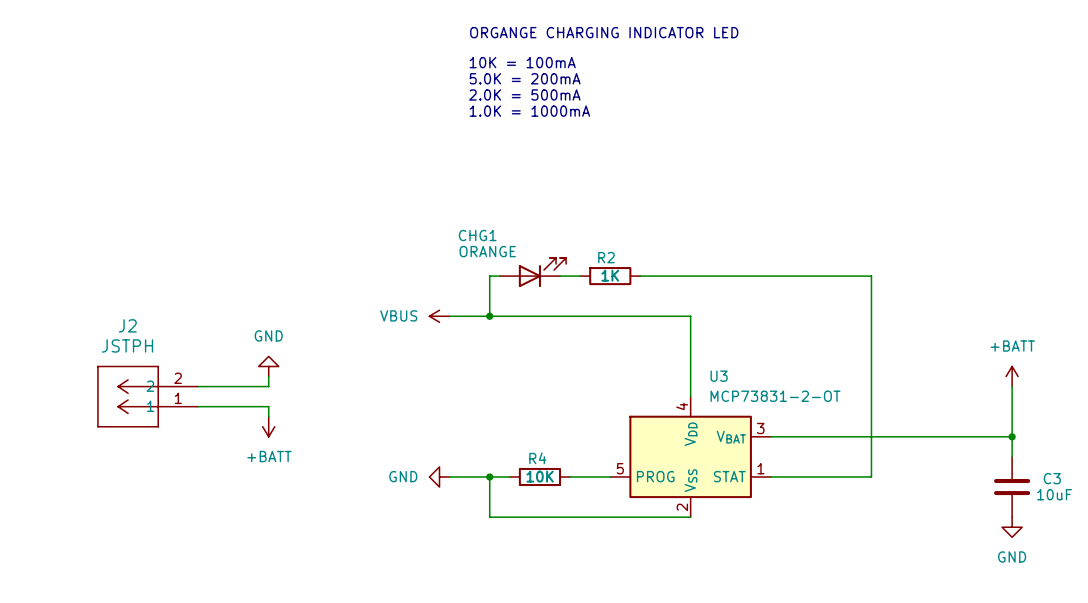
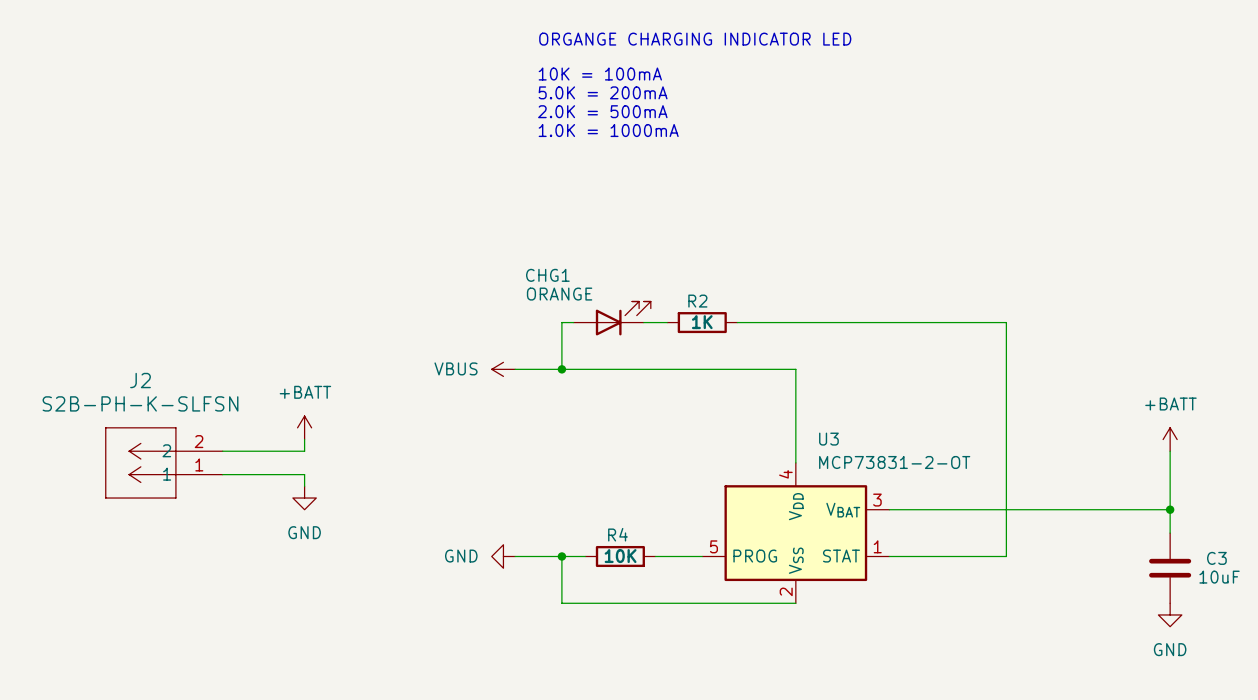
J2 value: JSTPH (127, 345) -> S2B-PH-K-SLFSN (140, 403)
power symbol: GND (268, 366) -> +BATT (304, 427)
power symbol: +BATT (268, 426) -> GND (304, 498)

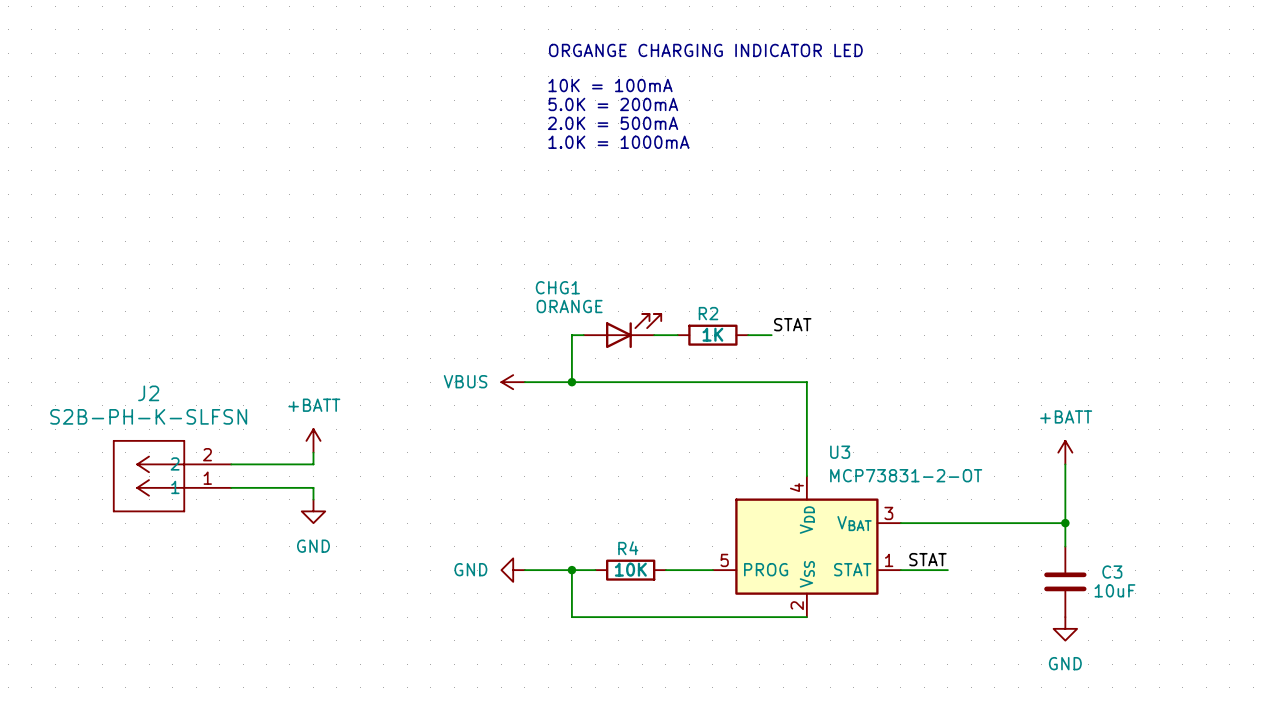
label: none -> STAT (792, 324)
wire: (760, 322) (1006, 322) (1006, 556) (936, 556) -> none
power symbol position: +BATT (1170, 439) -> +BATT (1065, 452)
wire: (1170, 451) (1170, 533) -> (1065, 464) (1065, 546)
wire: (1053, 509) (1170, 509) -> none
junction: none -> (1065, 523)
junction: (1170, 509) -> none
label: none -> STAT (927, 559)
C3 position: (1170, 568) -> (1065, 581)
power symbol position: GND (1170, 614) -> GND (1065, 628)

